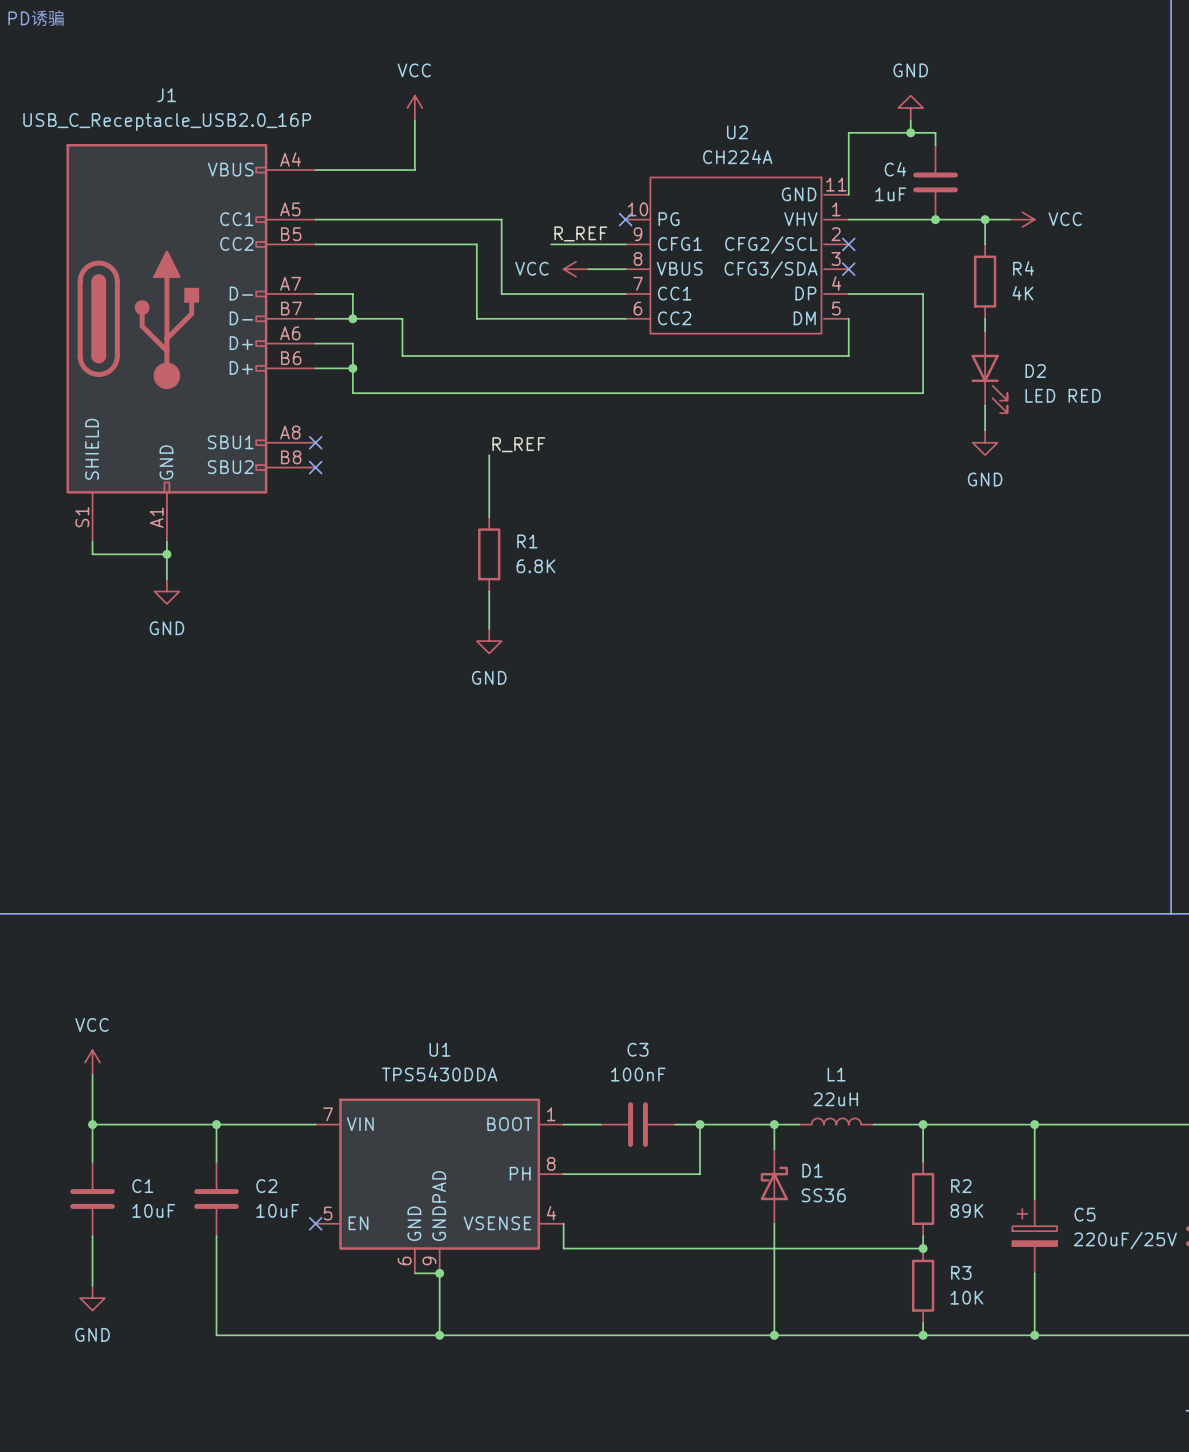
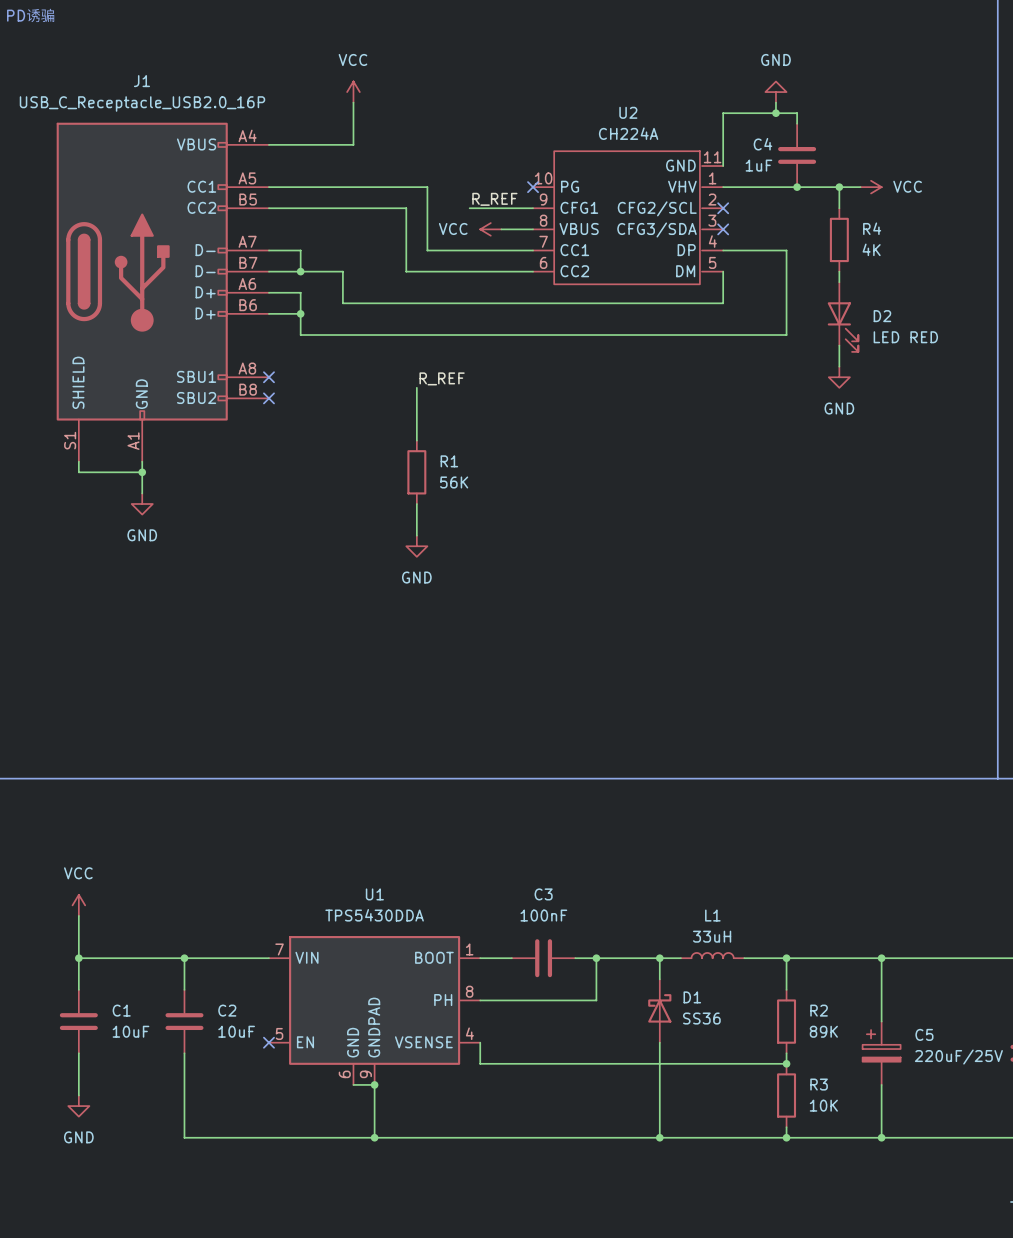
R1 value: 6.8K (535, 566) -> 56K (454, 482)
L1 value: 22uH (835, 1099) -> 33uH (712, 936)

